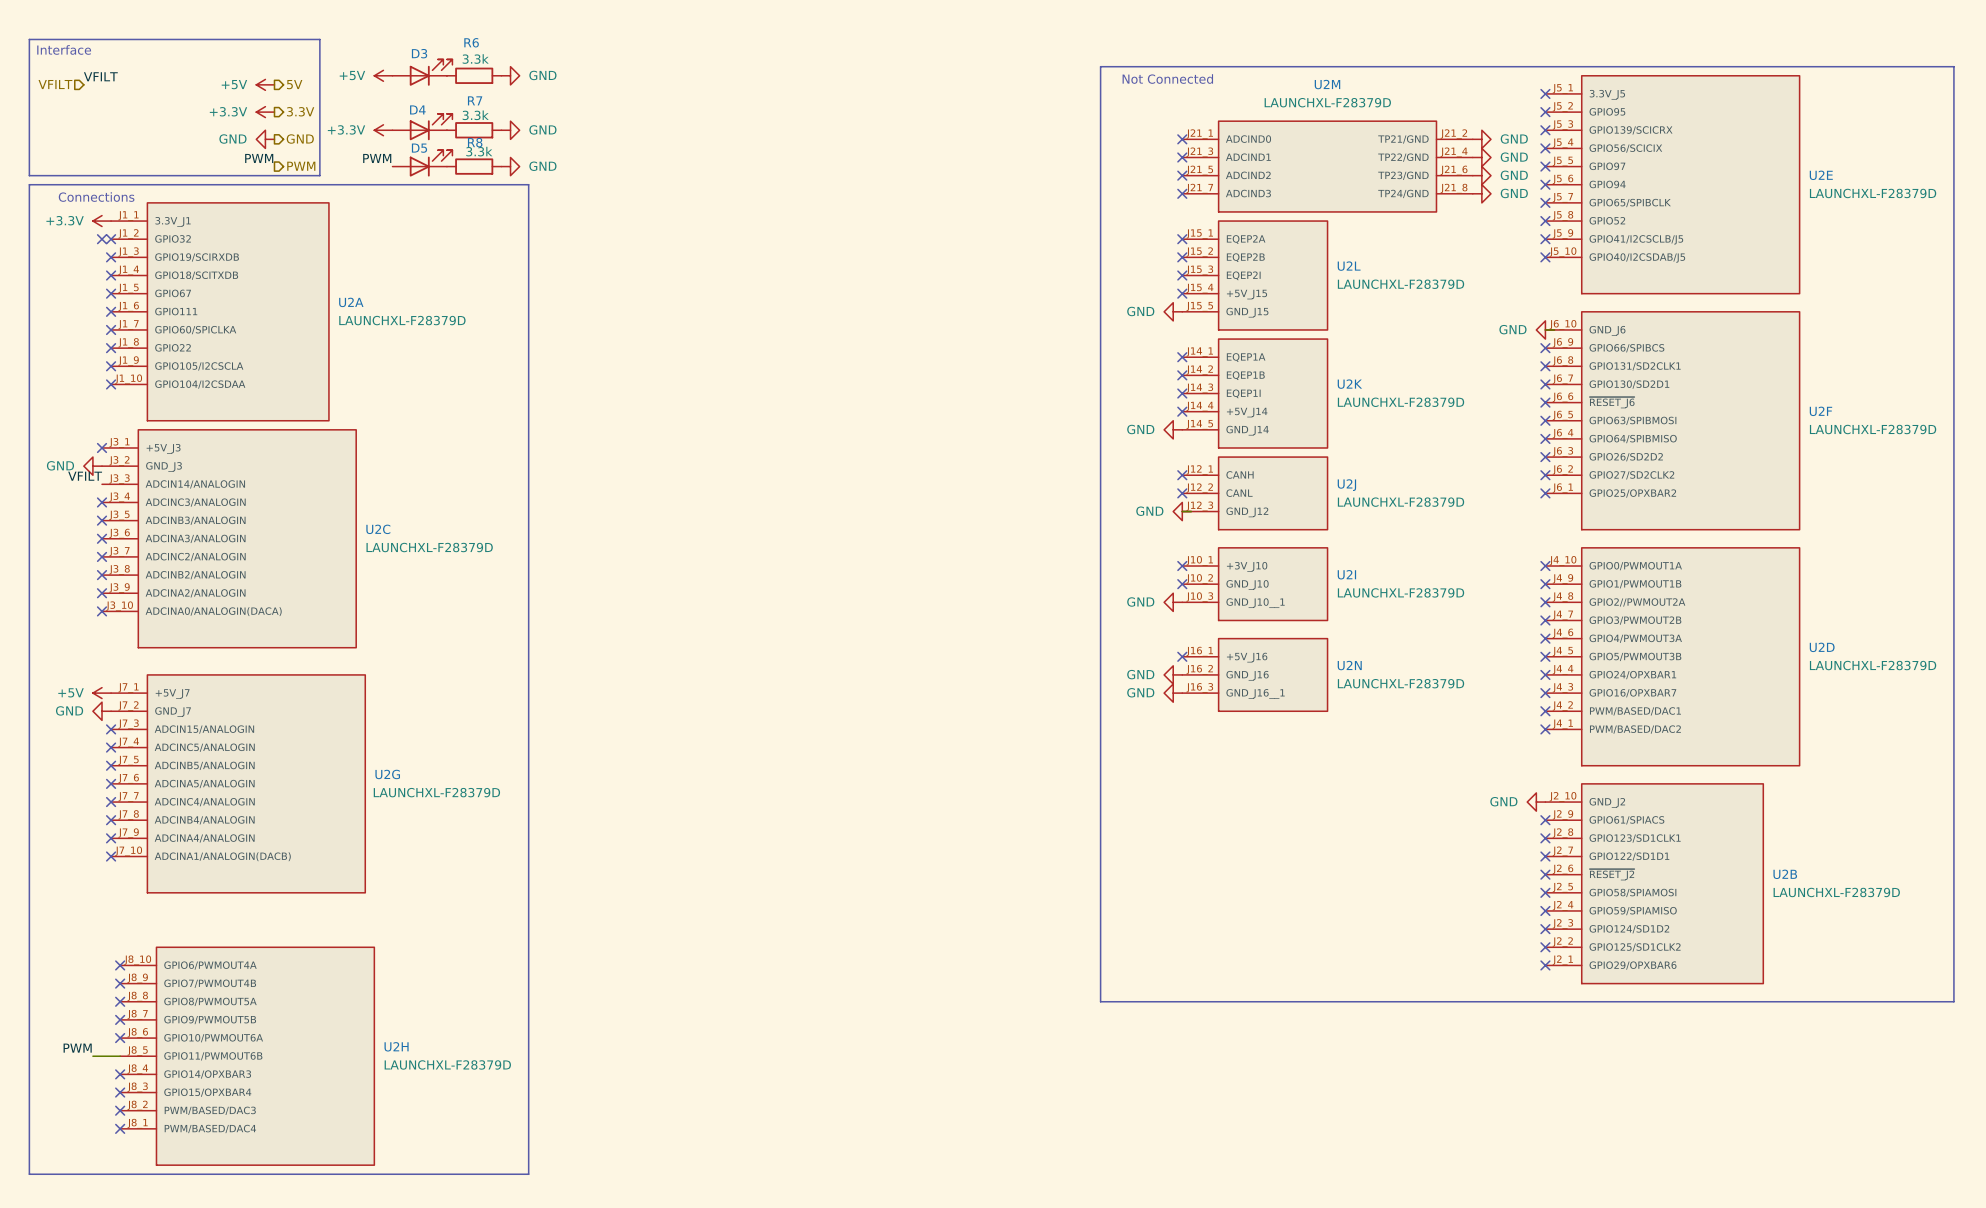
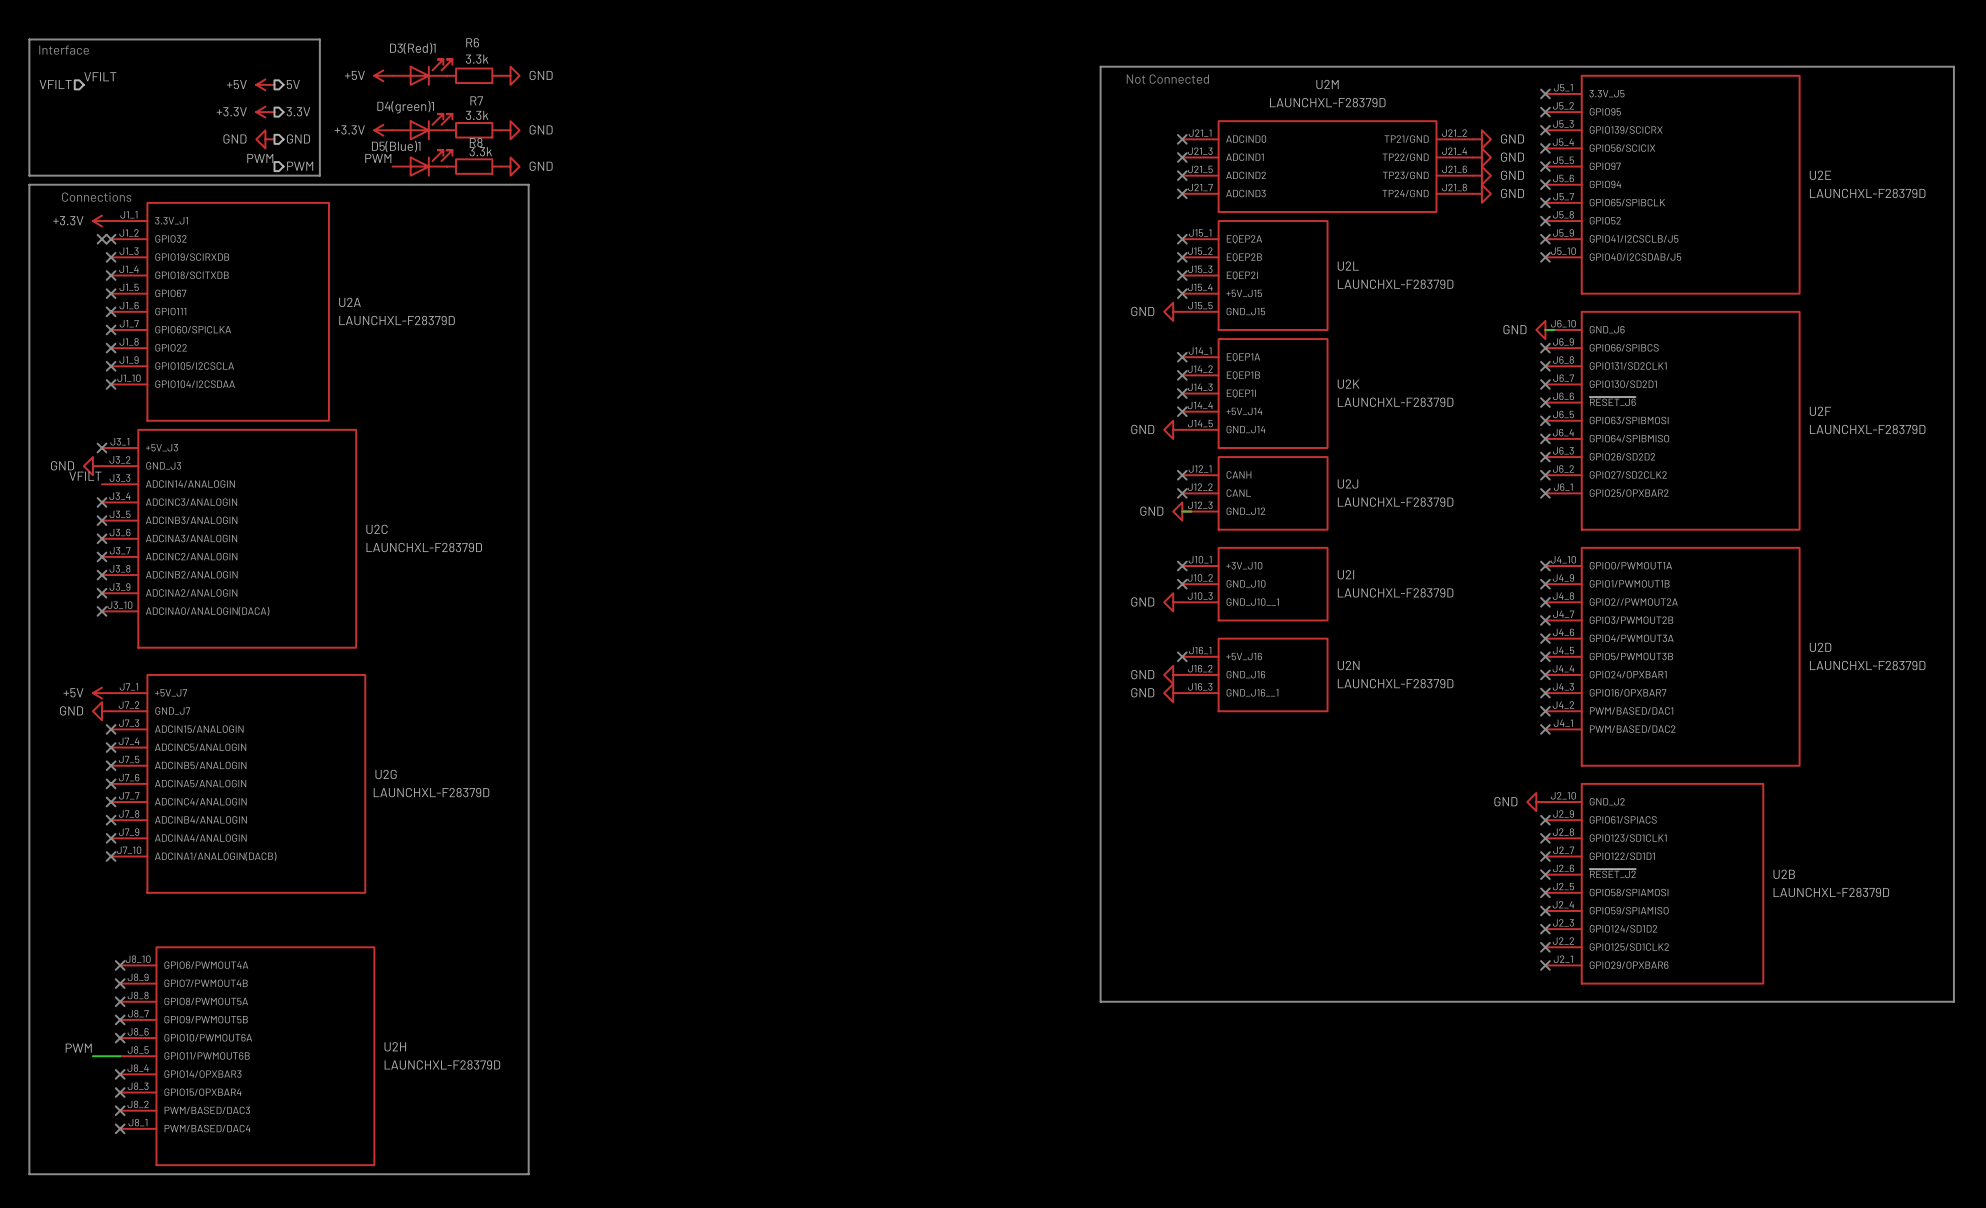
D3 name: D3 (419, 53) -> D3(Red)1 (412, 48)
D4 name: D4 (417, 109) -> D4(green)1 (405, 107)
D5 name: D5 (419, 148) -> D5(Blue)1 (396, 146)

